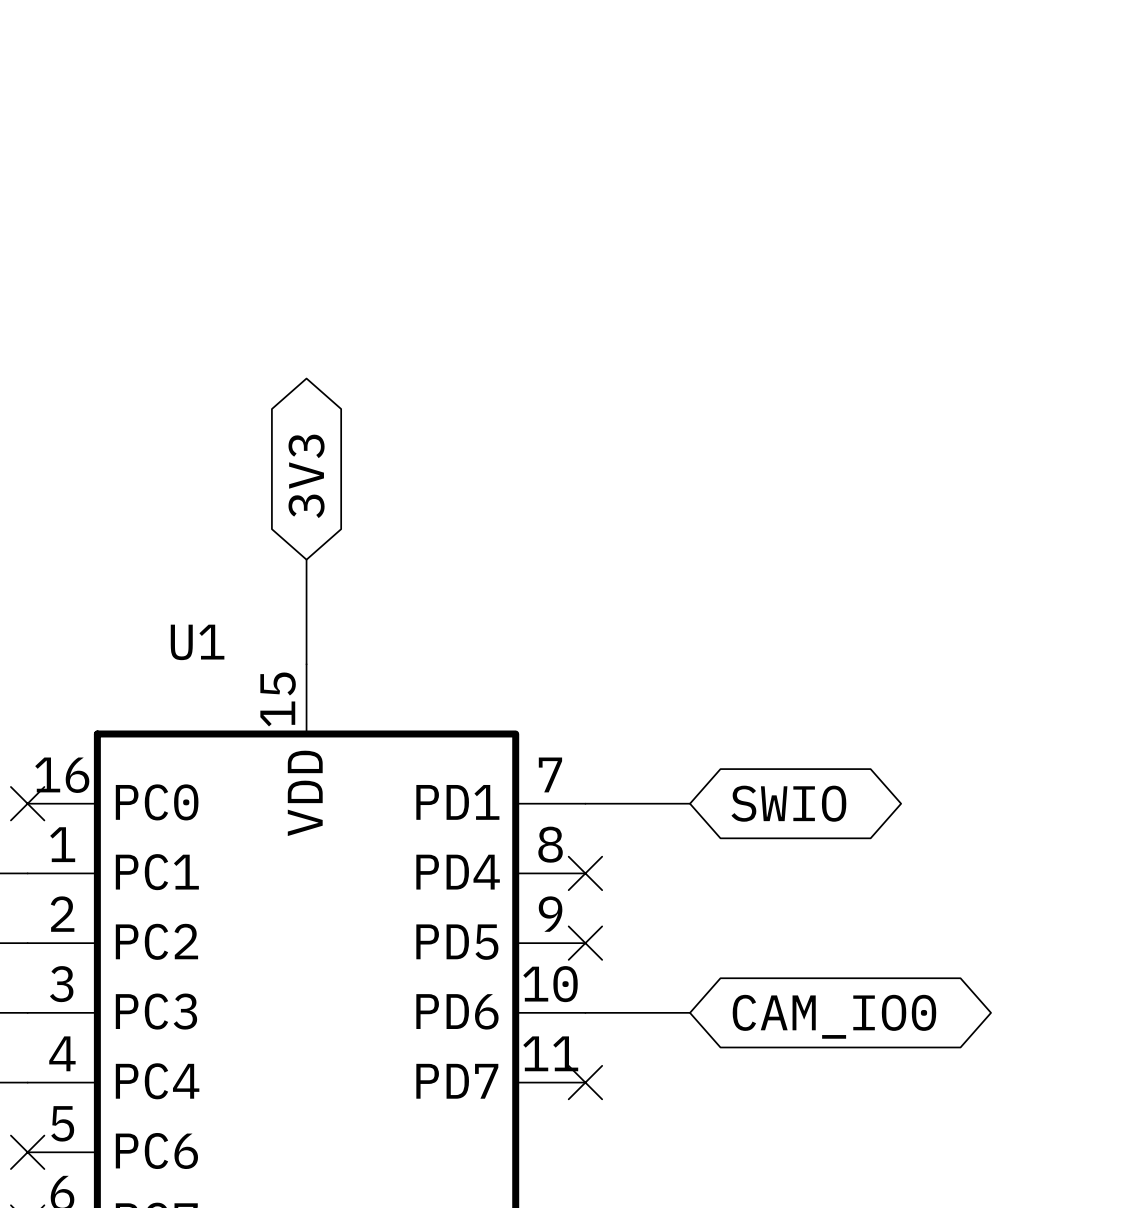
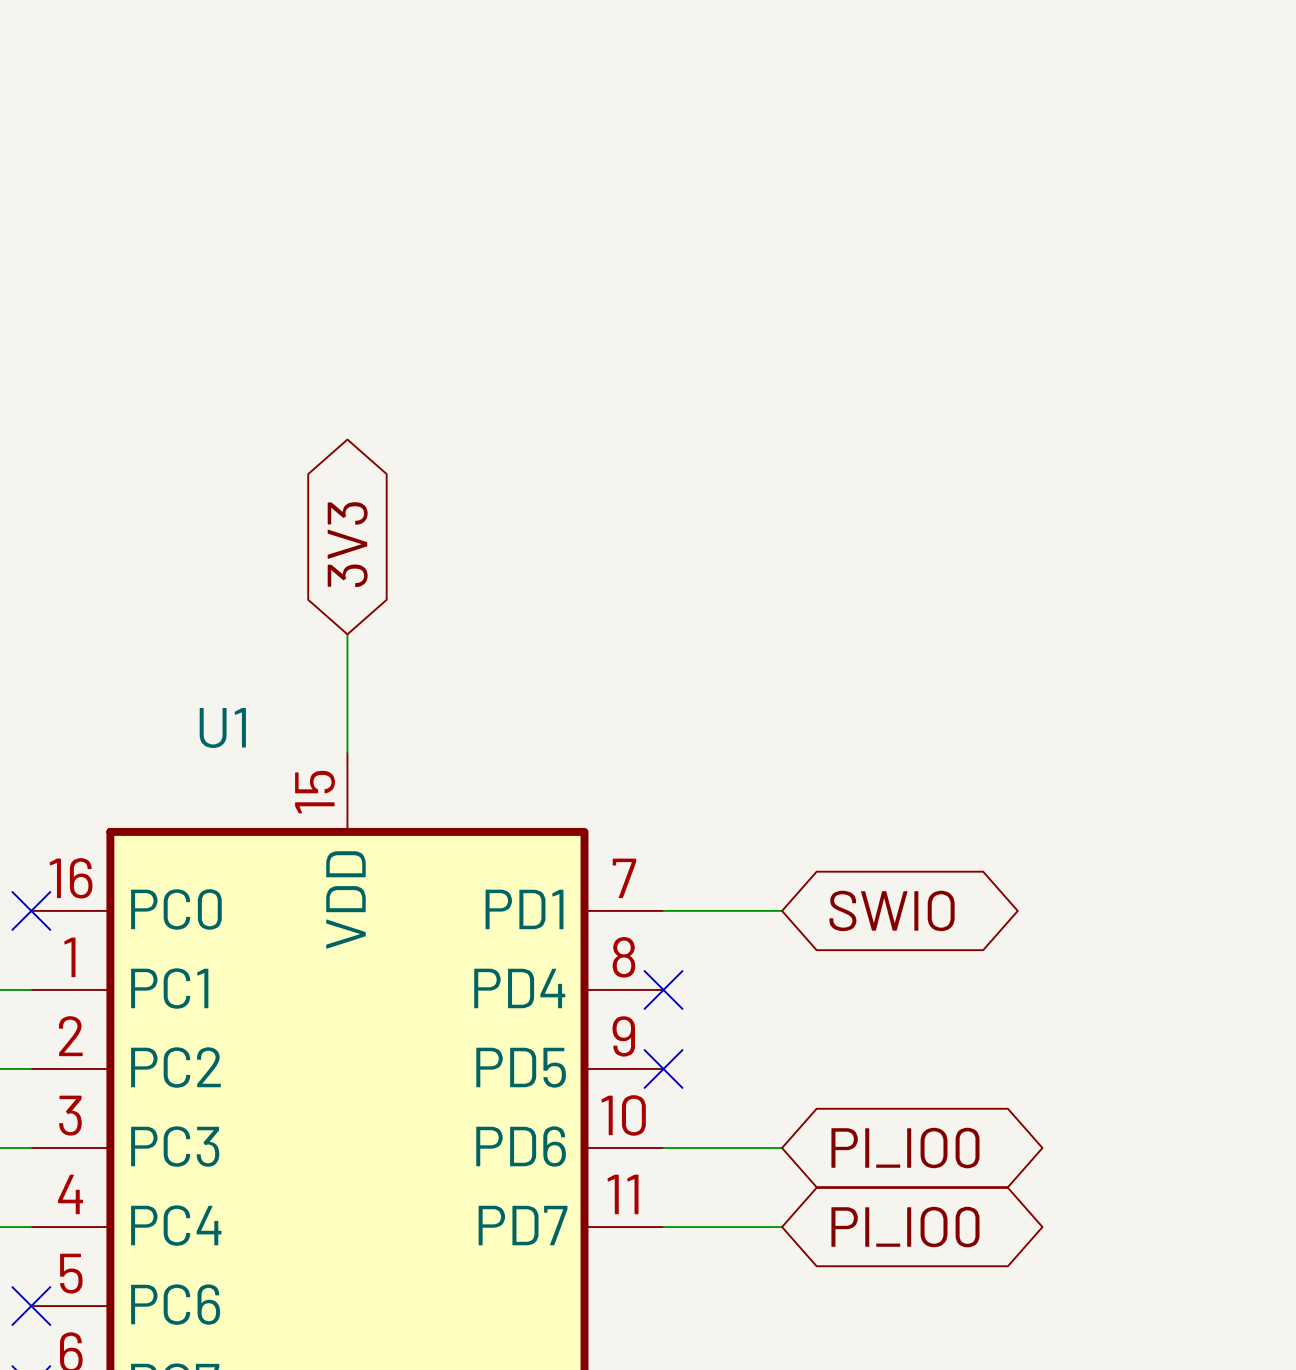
global label: CAM_IO0 (834, 1016) -> PI_IO0 (905, 1148)
wire: none -> (663, 1227) (782, 1227)
no-connect mark: (585, 1082) -> none
global label: none -> PI_IO0 (905, 1227)

